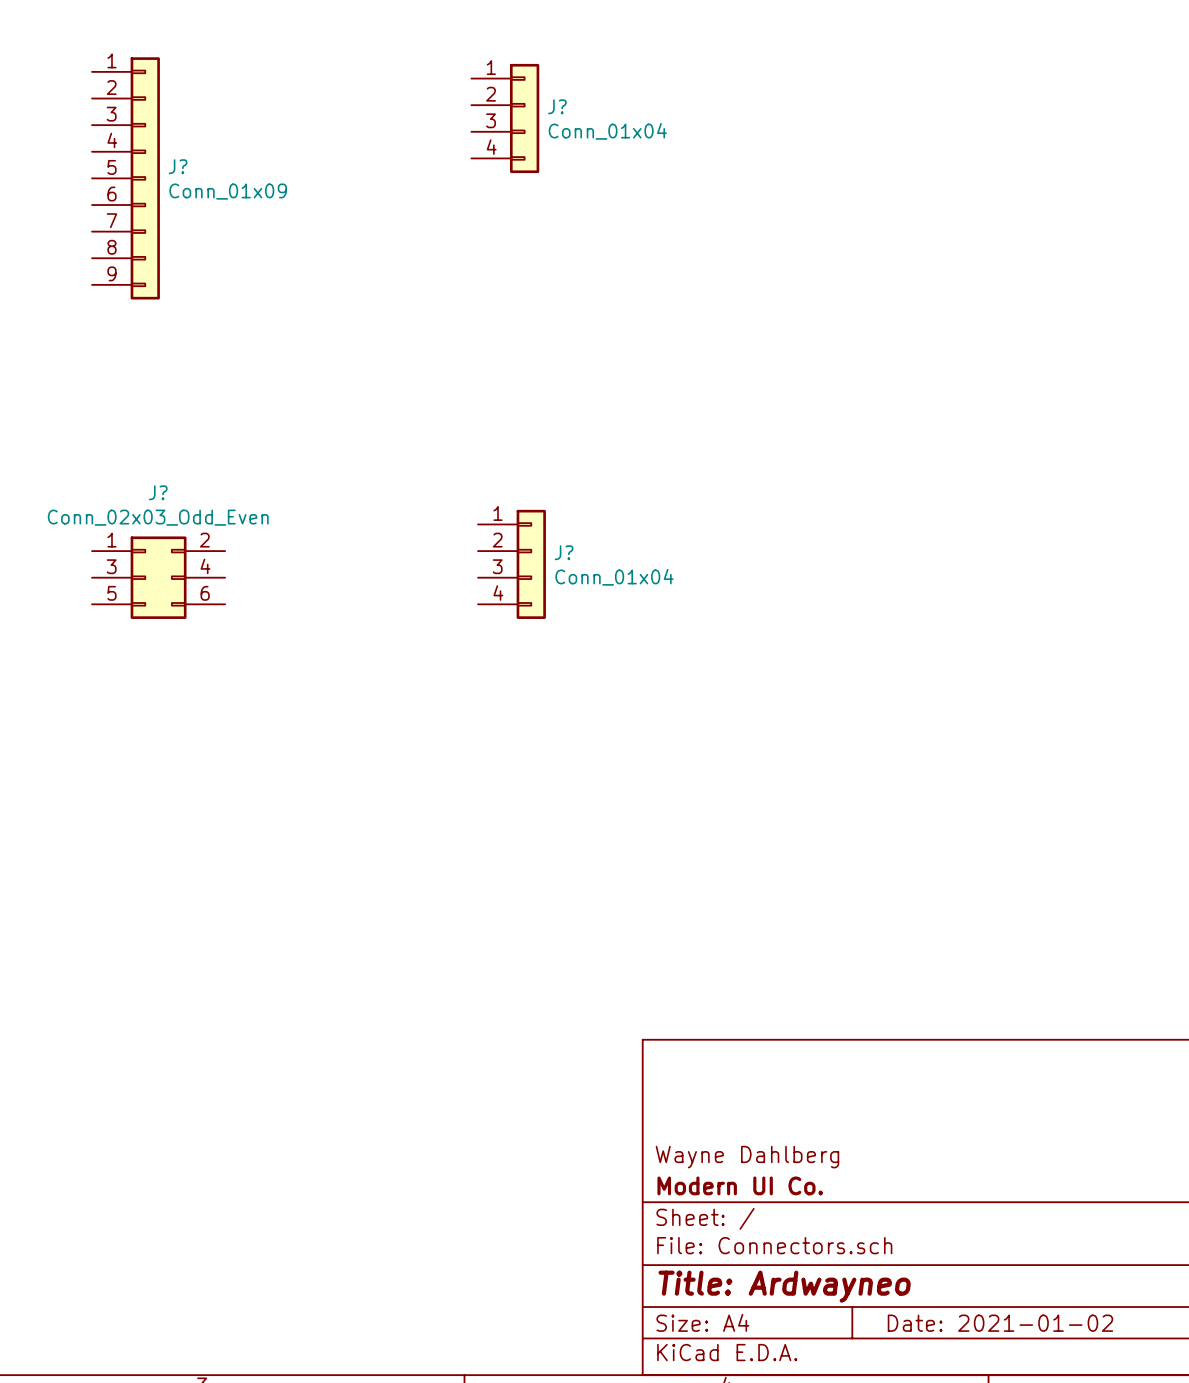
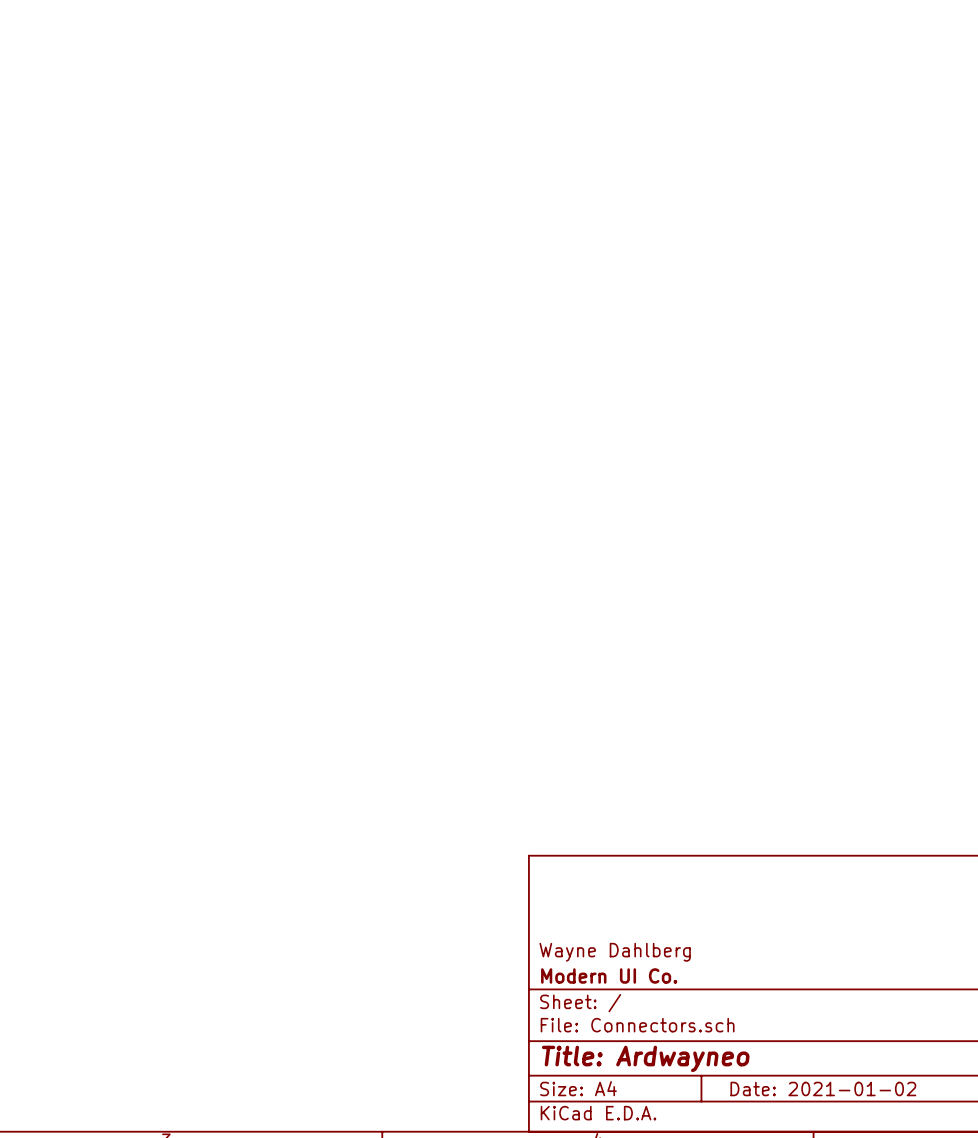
J?: Conn_01x04 (505, 118) -> none
J?: Conn_01x09 (125, 178) -> none
J?: Conn_01x04 (511, 564) -> none
J?: Conn_02x03_Odd_Even (158, 577) -> none

